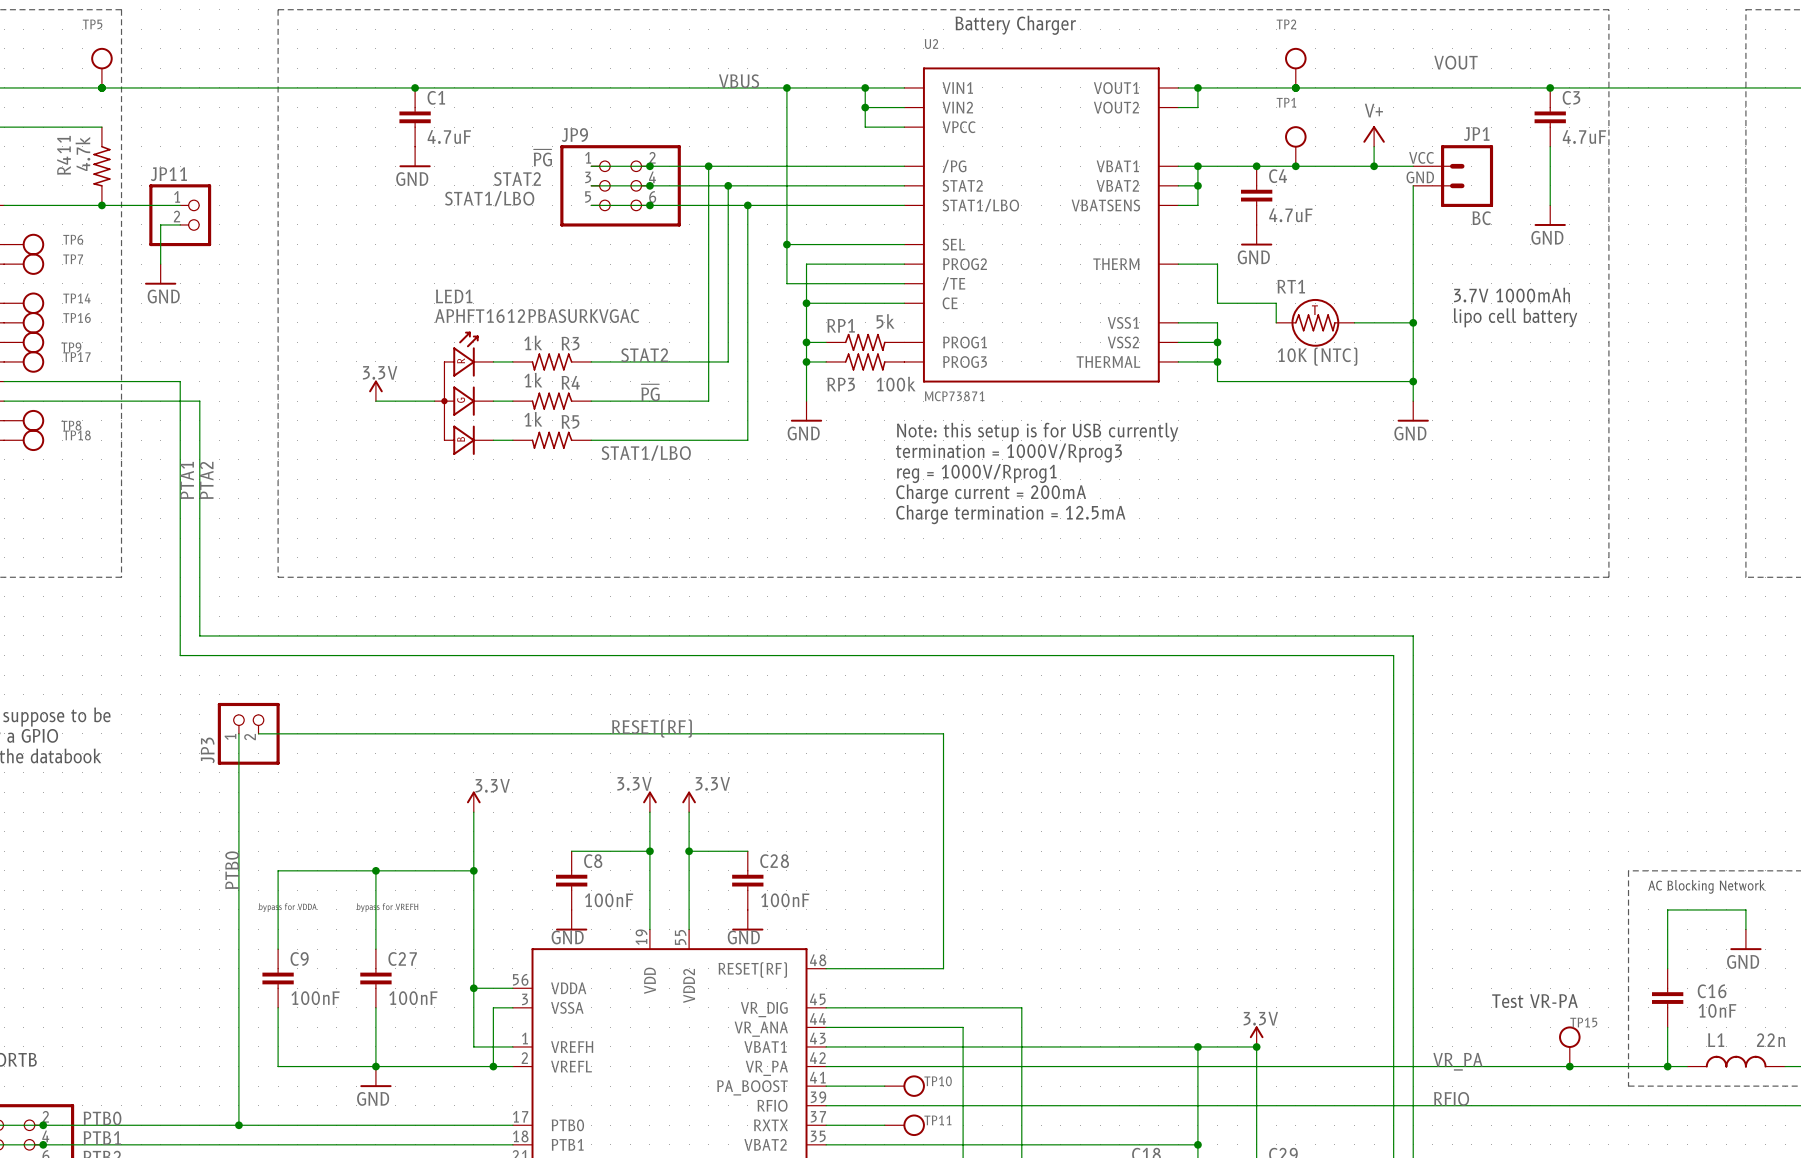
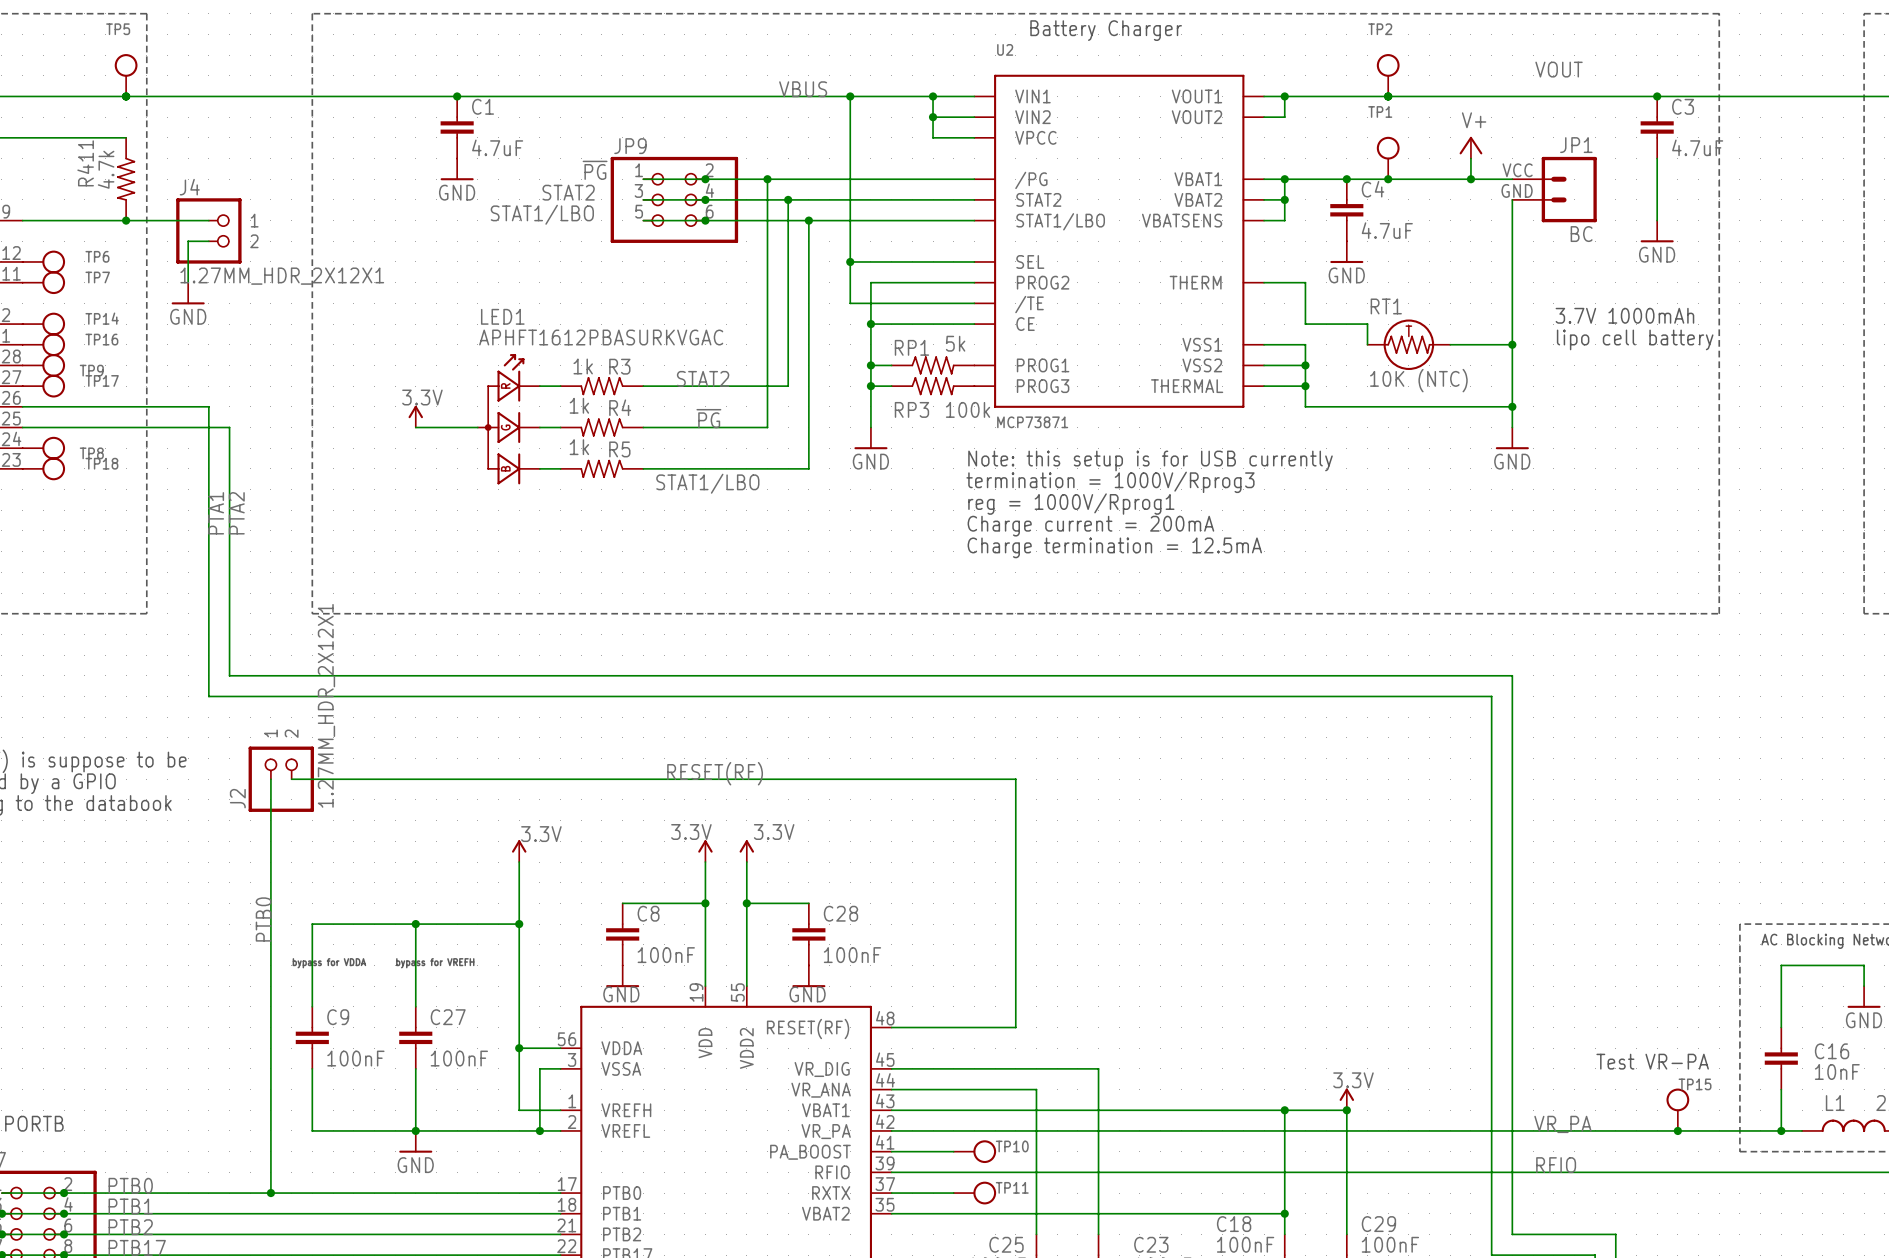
JP11 name: JP11 (168, 174) -> J4 (189, 187)
JP11 pin number: 1 (177, 196) -> none
JP11 pin name: none -> 1 (254, 220)
JP11 pin number: 2 (177, 216) -> none
JP11 pin name: none -> 2 (254, 241)
JP11 value: none -> 1.27MM_HDR_2X12X1 (282, 276)
JP3 value: none -> 1.27MM_HDR_2X12X1 (326, 705)
JP3 pin name: none -> 1 (270, 733)
JP3 pin name: none -> 2 (291, 733)
JP3 pin number: 1 (230, 736) -> none
JP3 pin number: 2 (250, 737) -> none
JP3 name: JP3 (207, 750) -> J2 (237, 798)

